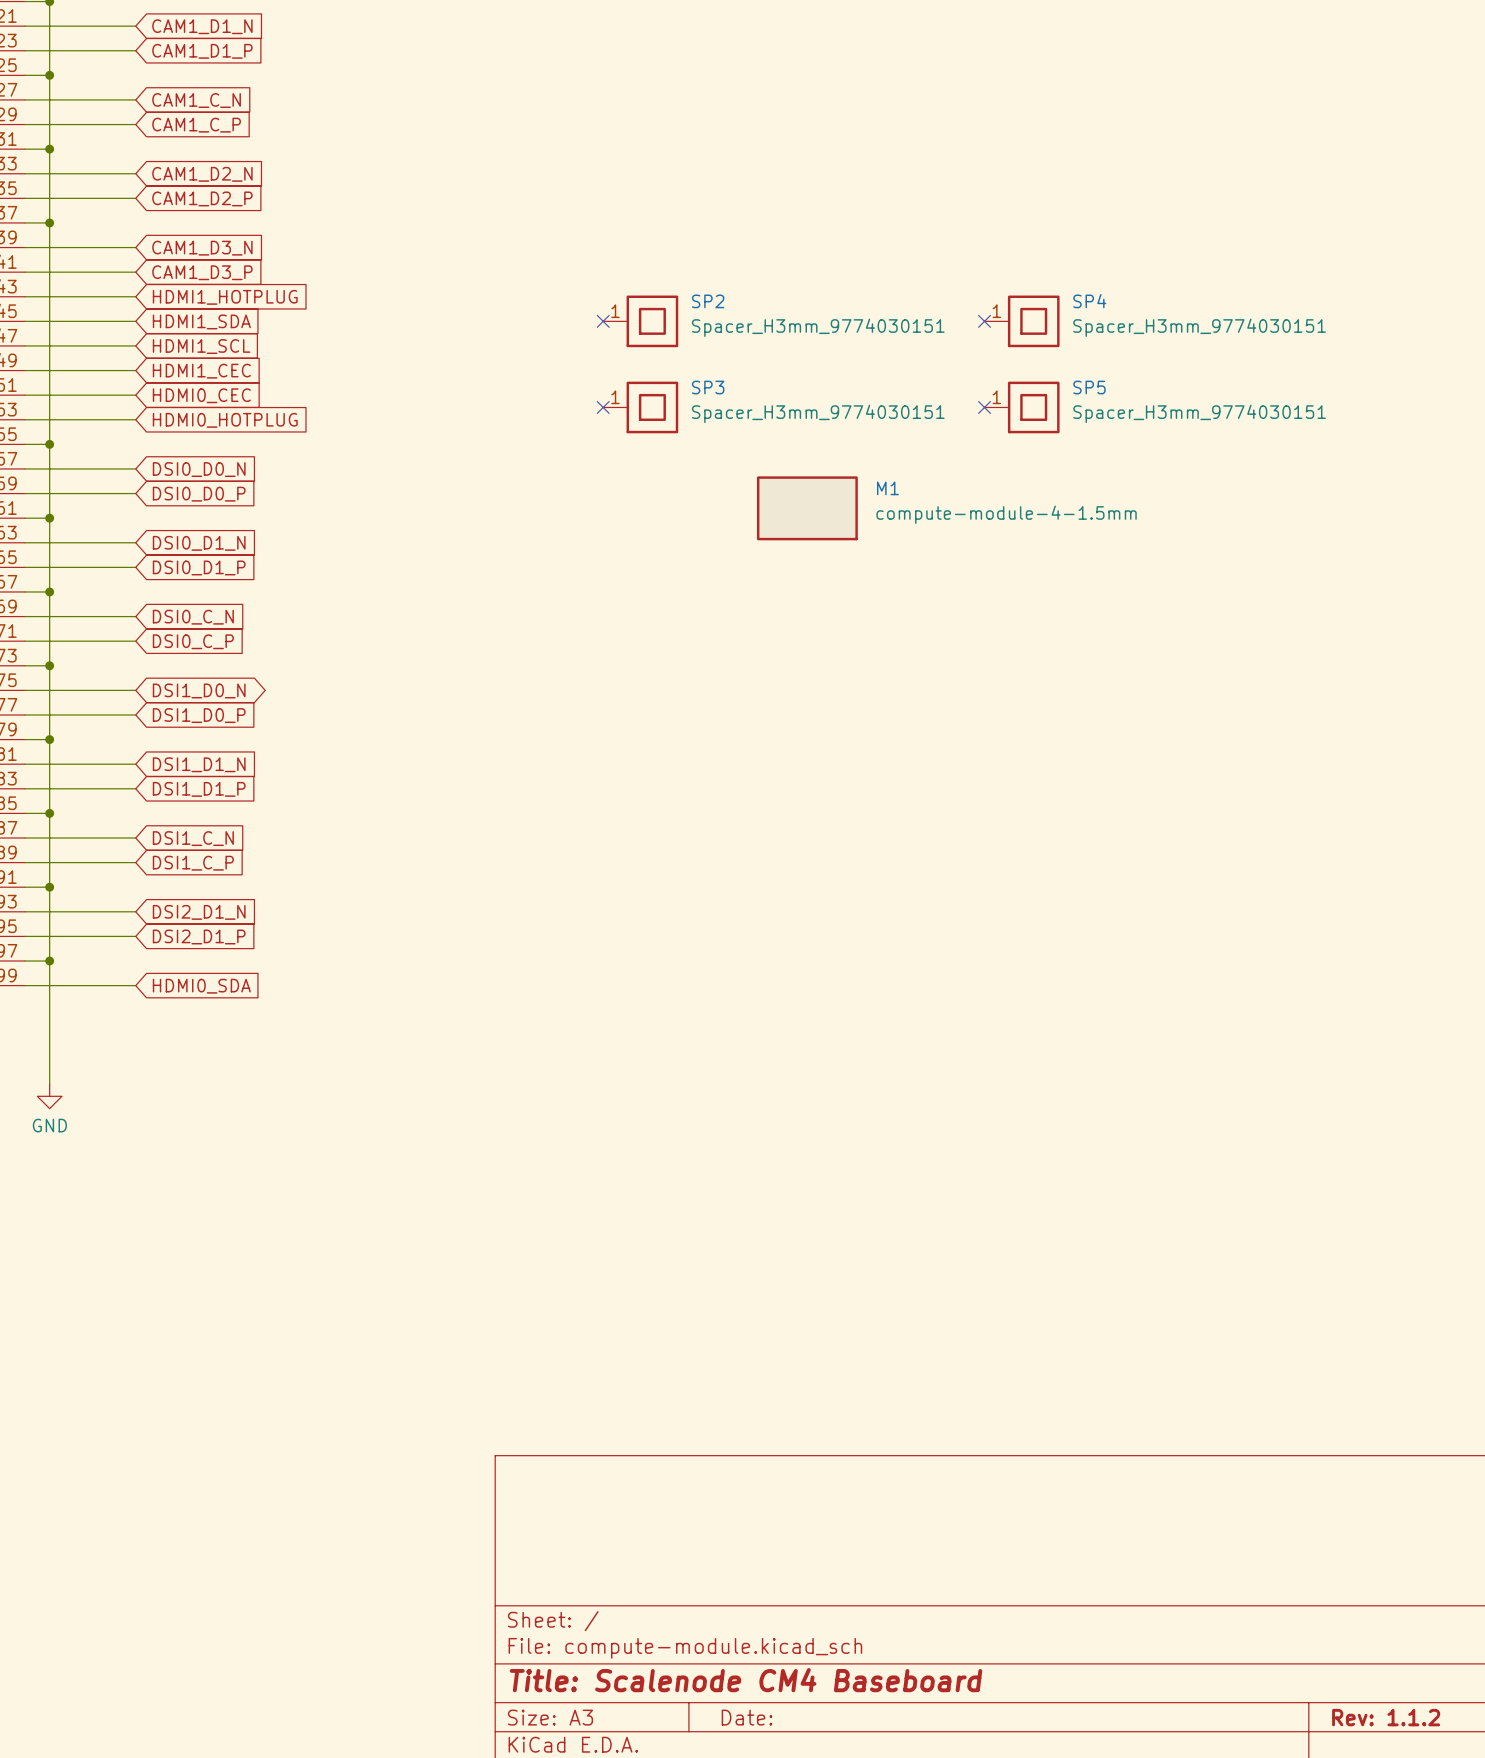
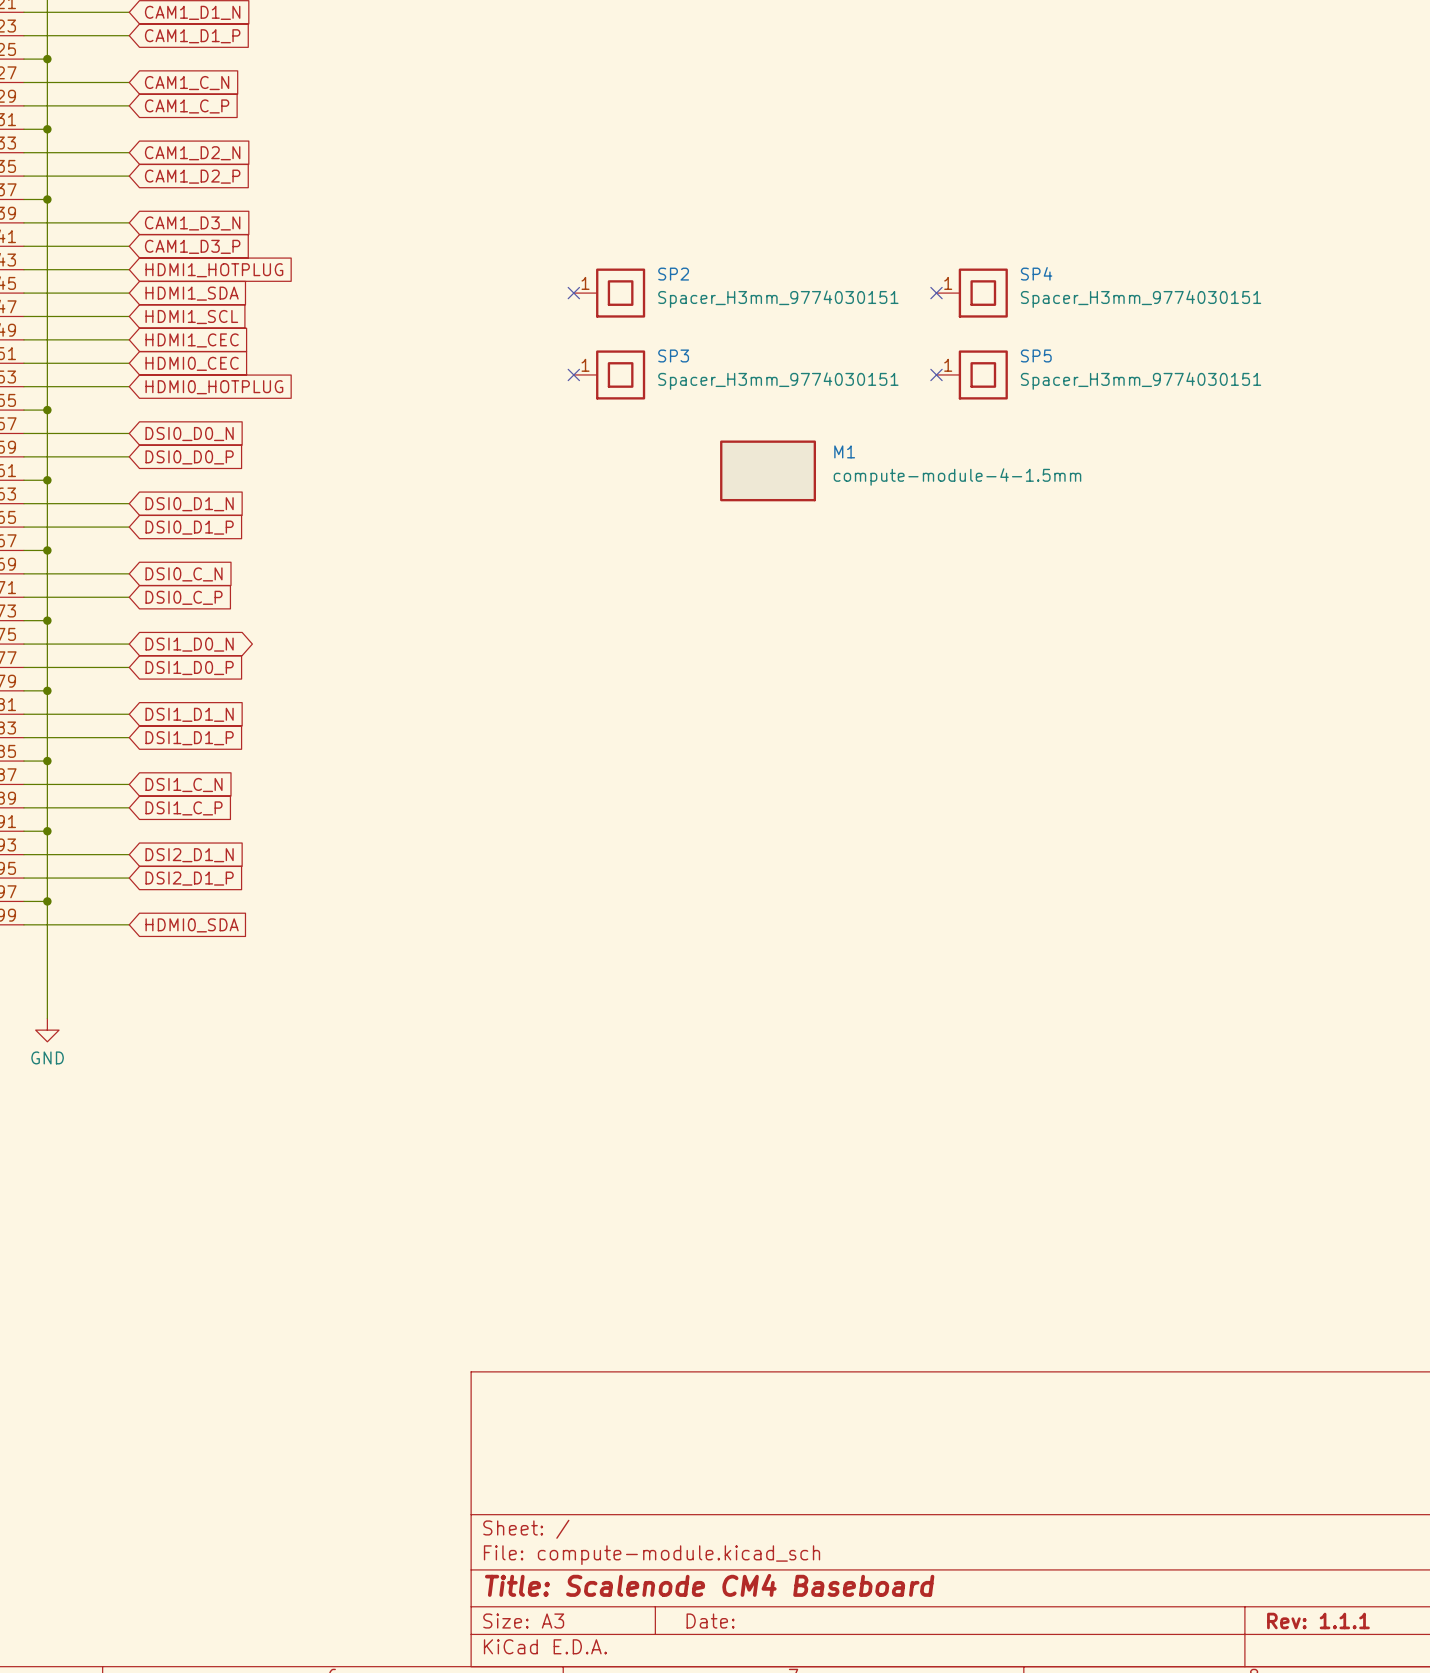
title block: Rev: 1.1.2 (1386, 1717) -> Rev: 1.1.1 (1318, 1621)

